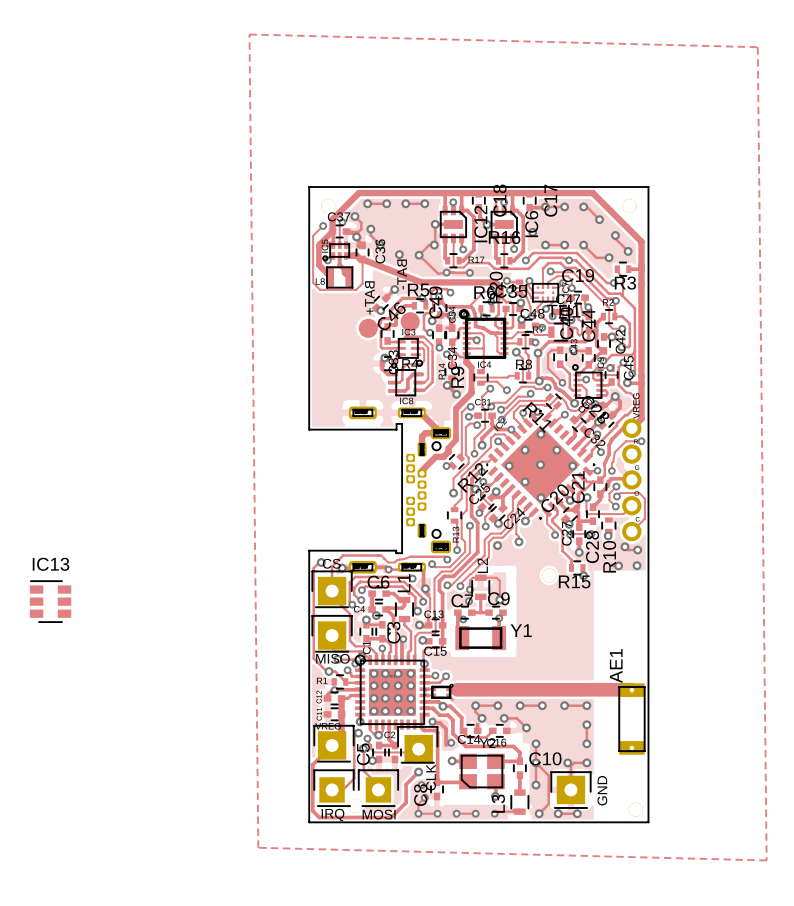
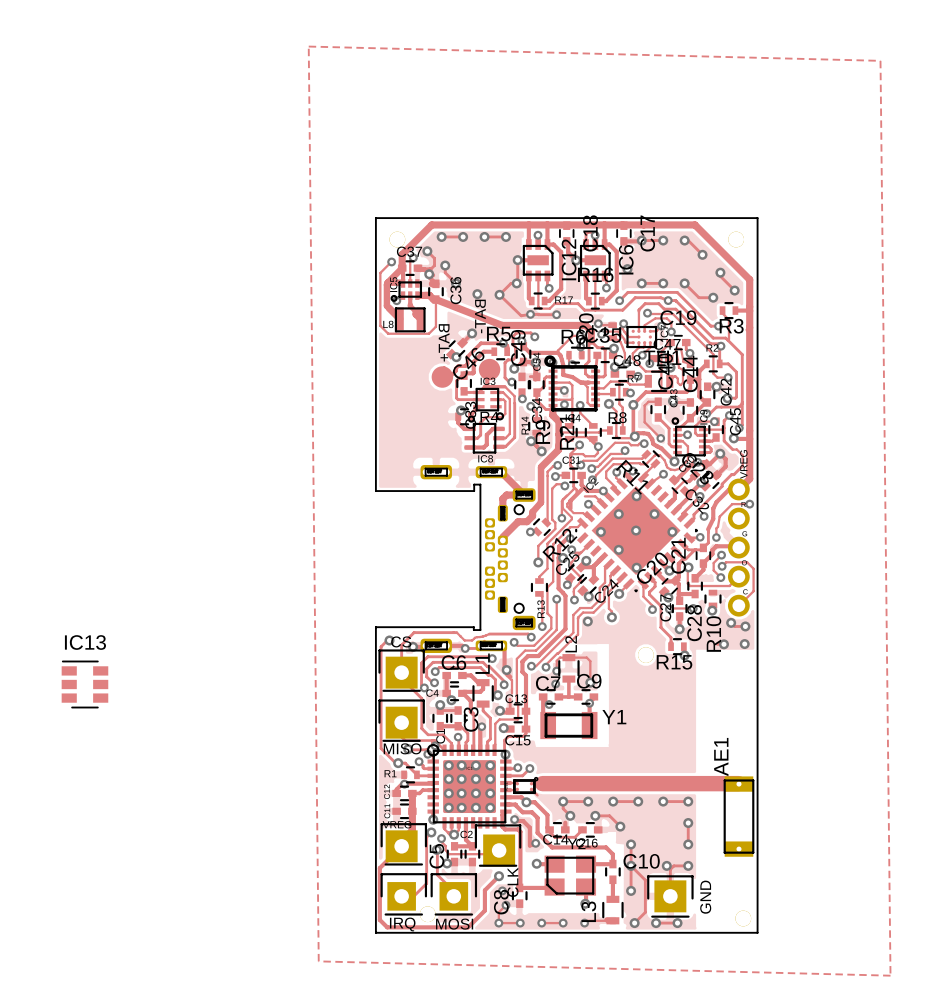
via: none -> (564, 404)
track: none -> (580, 405) (580, 412) (593, 425)
via: none -> (580, 405)
R21: none -> (593, 432)
track: none -> (593, 438) (591, 438) (597, 445) (597, 453) (594, 456) (585, 456) (583, 454) (570, 455) (570, 467) (573, 469) (573, 486) (576, 489) (576, 494) (567, 503) (567, 506) (573, 513) (583, 513) (589, 516)
track: (494, 434) (490, 438) (490, 447) (483, 454) -> (566, 495) (562, 499) (562, 508) (571, 519)
via: (482, 445) -> none

